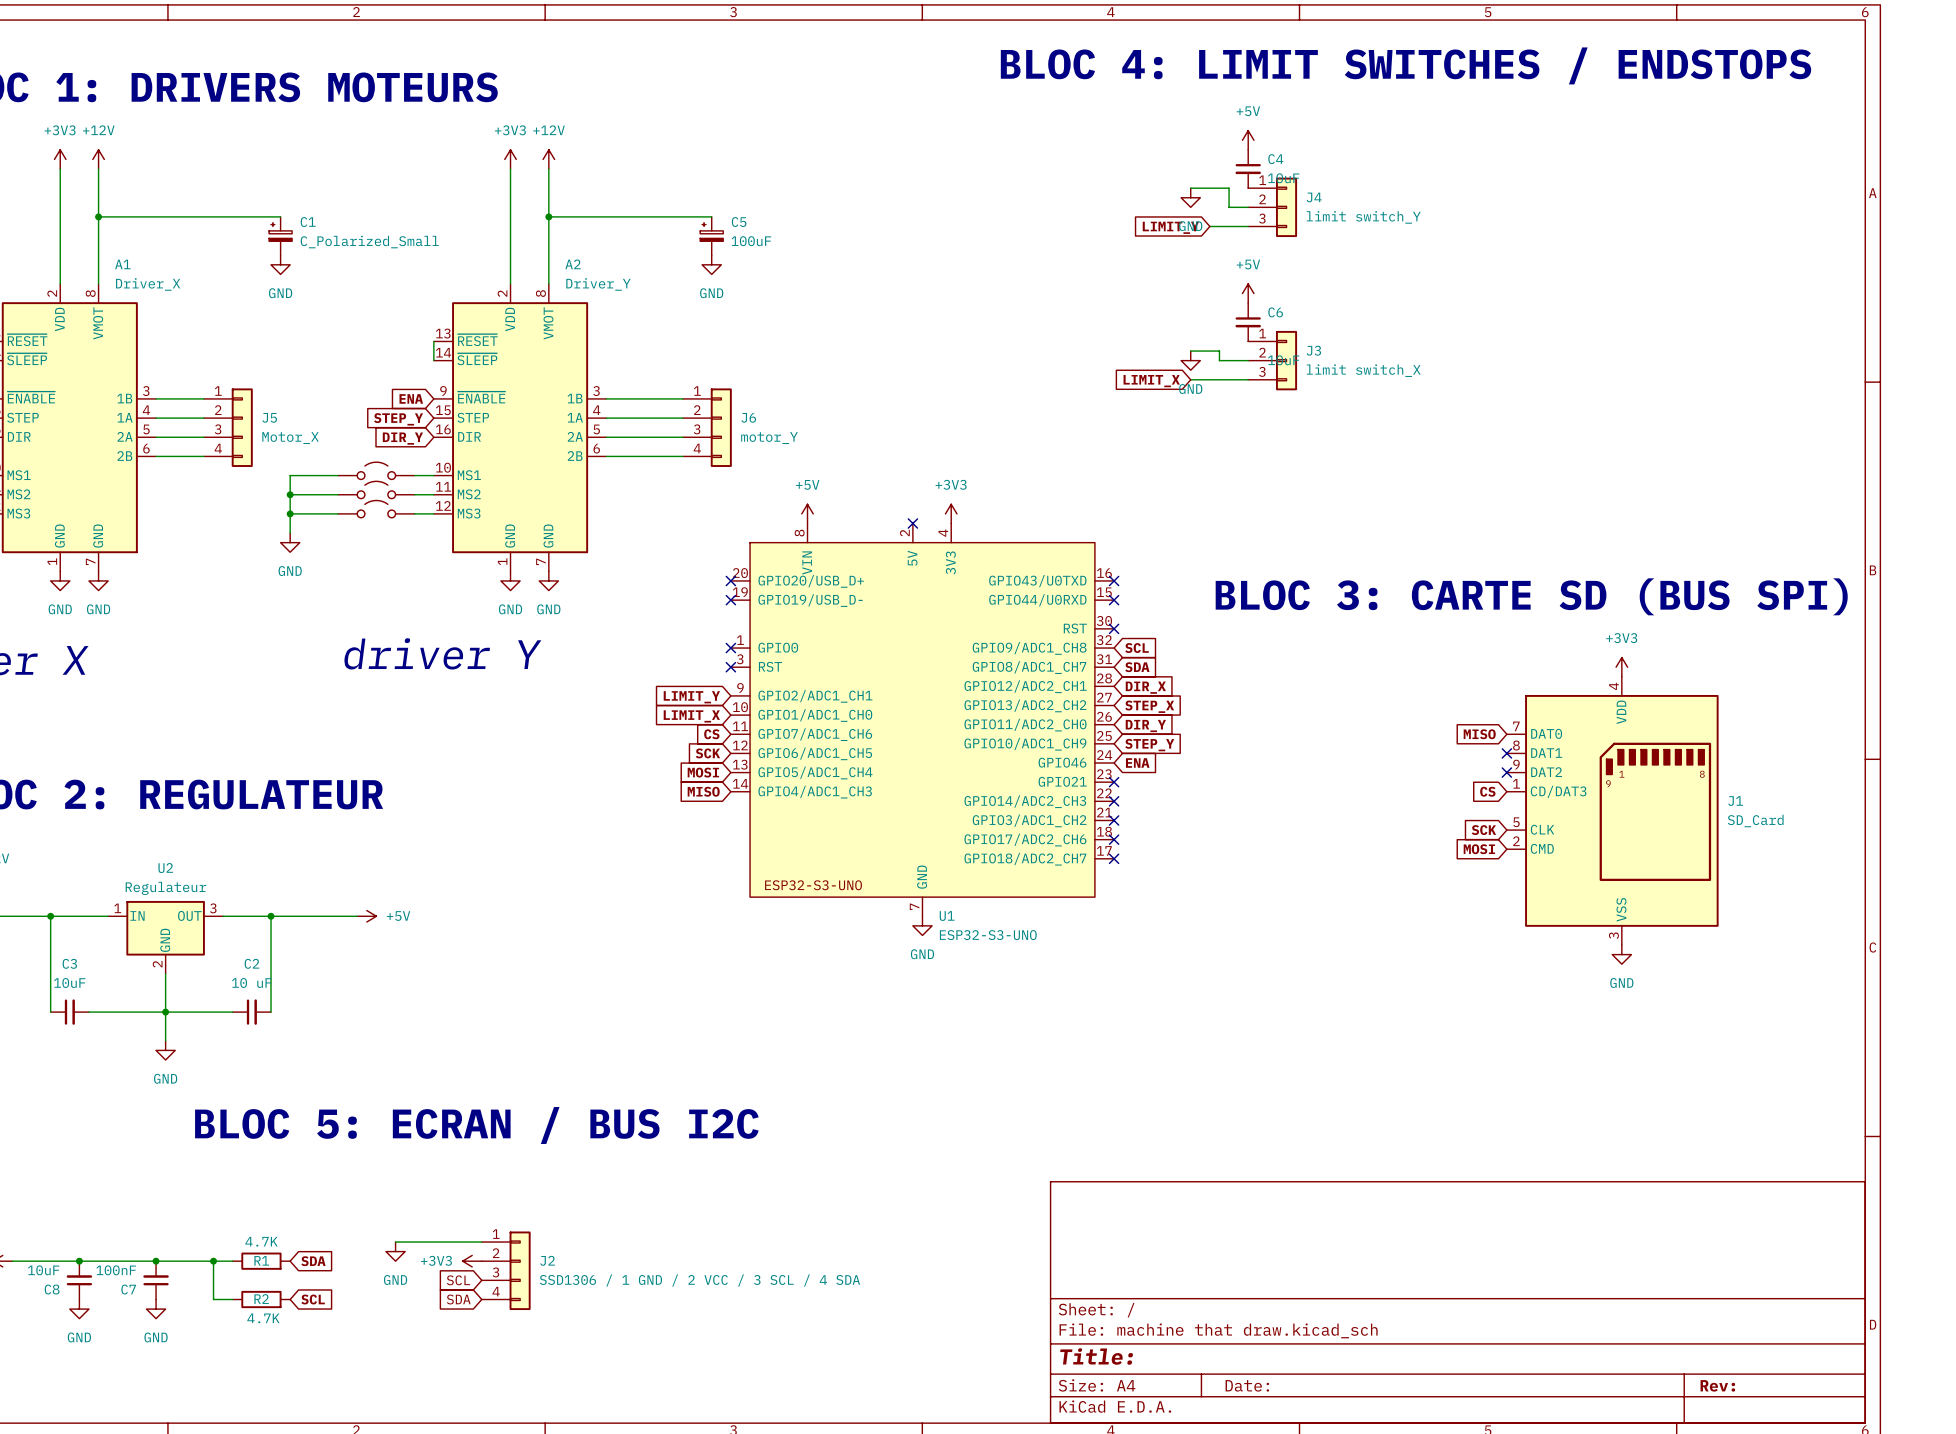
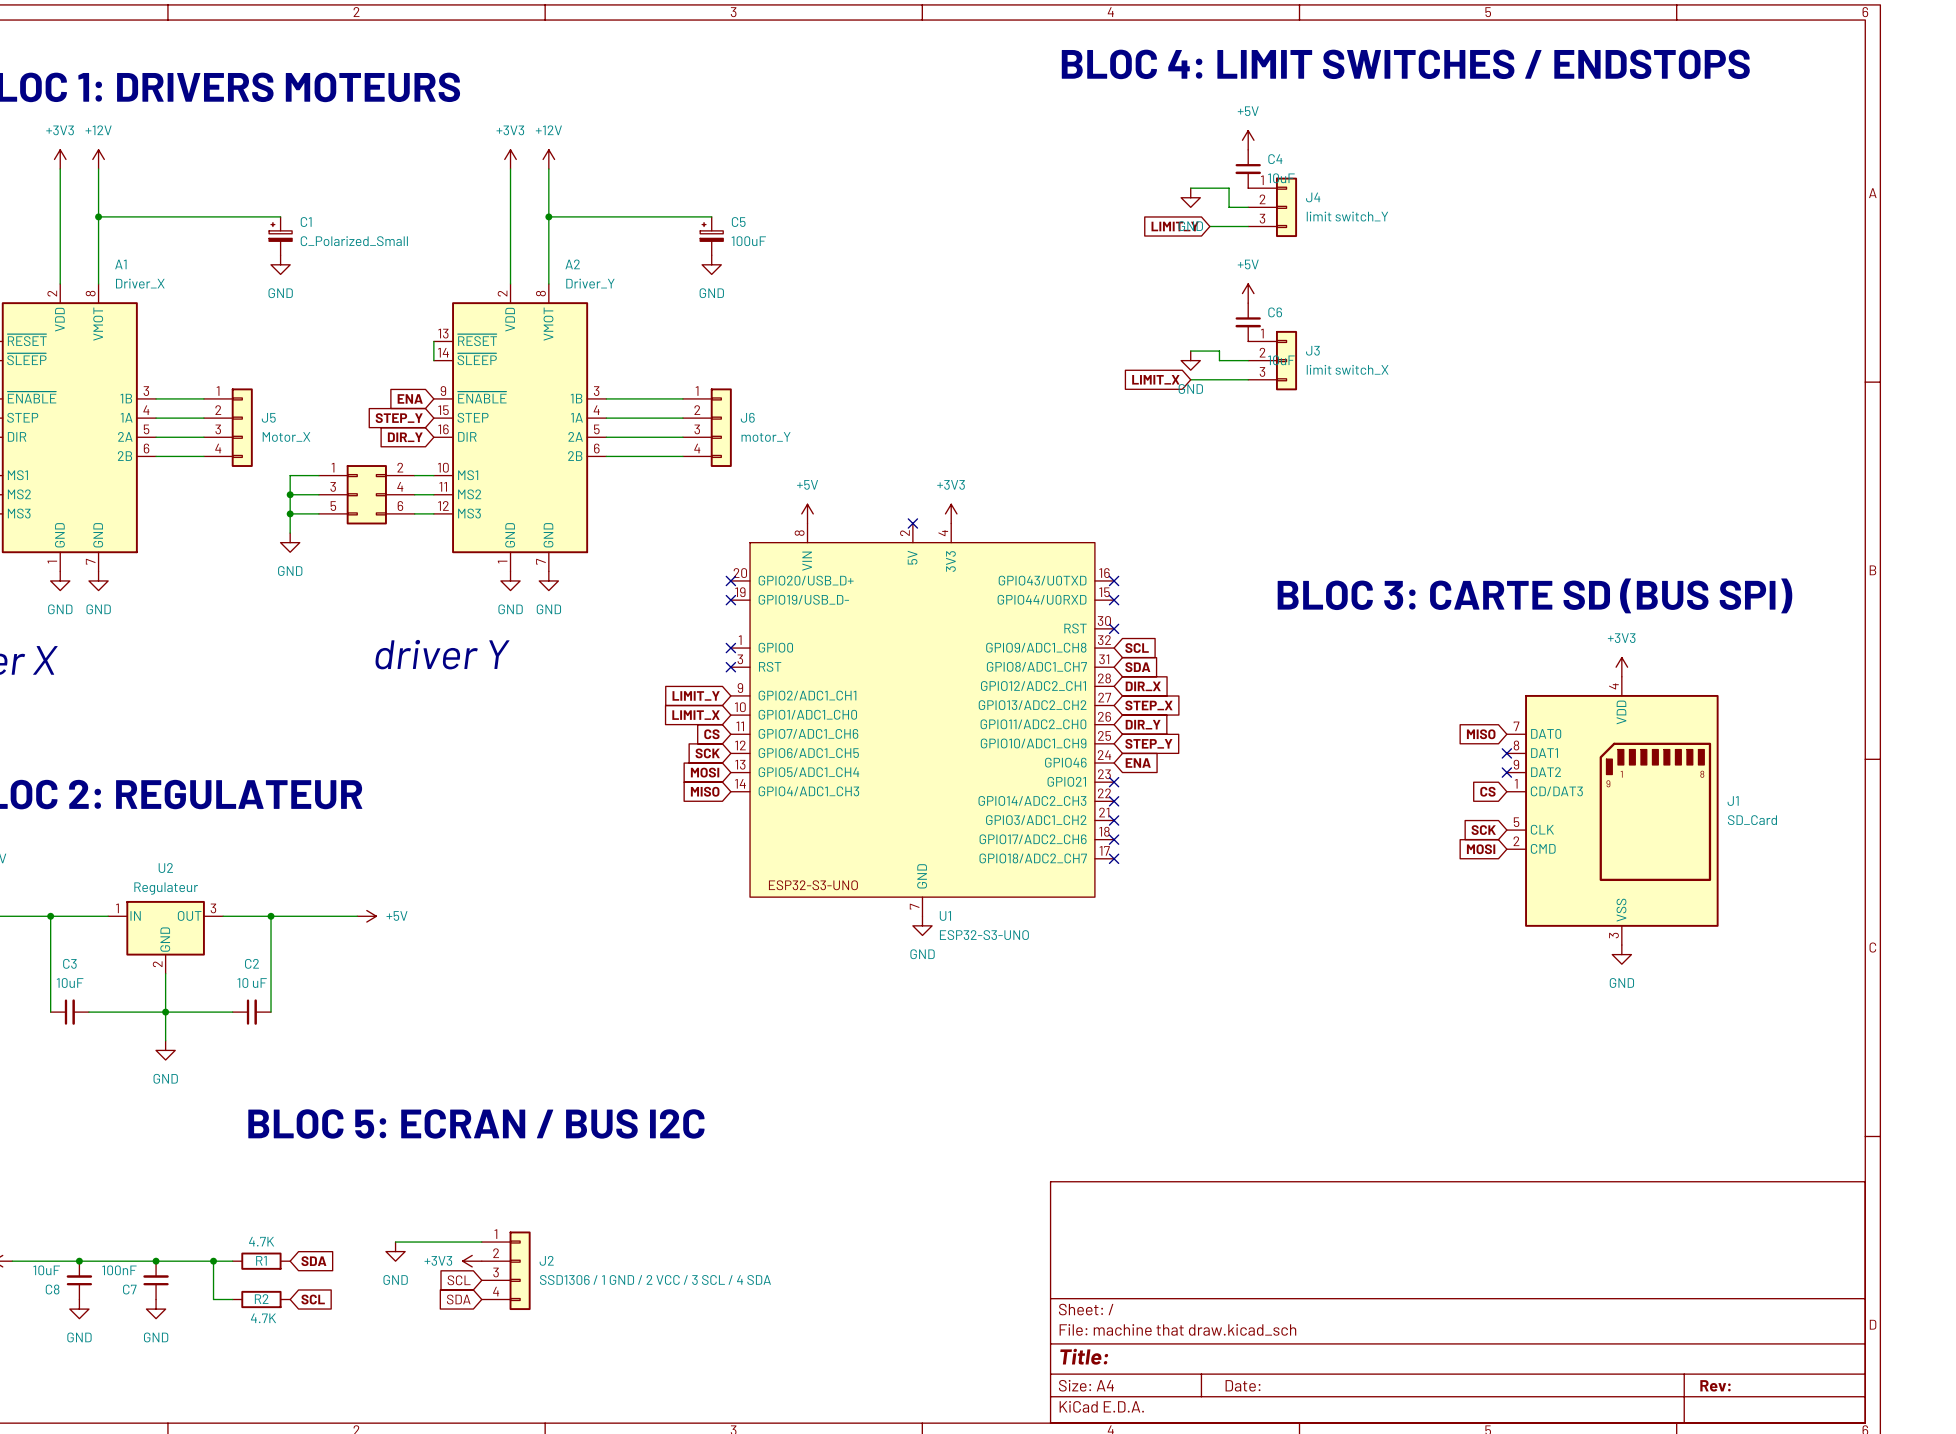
part: (376, 470) -> none
part: (376, 489) -> none
part: none -> (366, 494)
part: (376, 509) -> none

